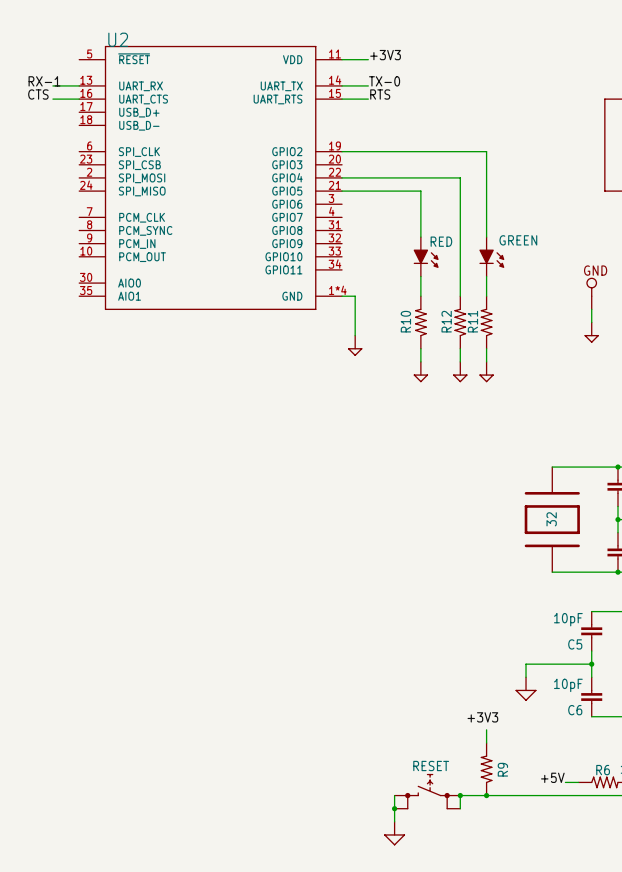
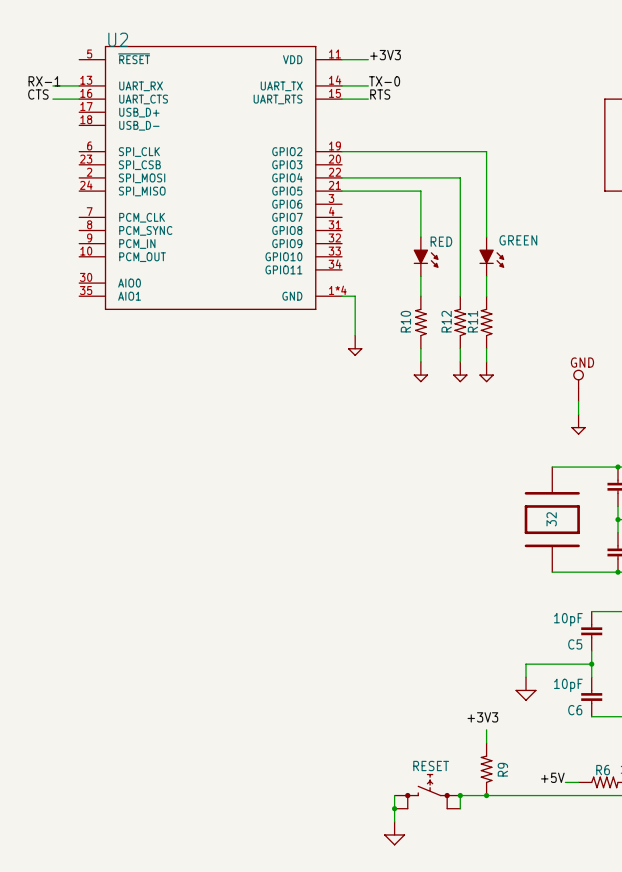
GND position: (591, 293) -> (578, 385)
wire: (591, 309) (591, 322) -> (578, 401) (578, 414)
power symbol position: (591, 332) -> (578, 424)

